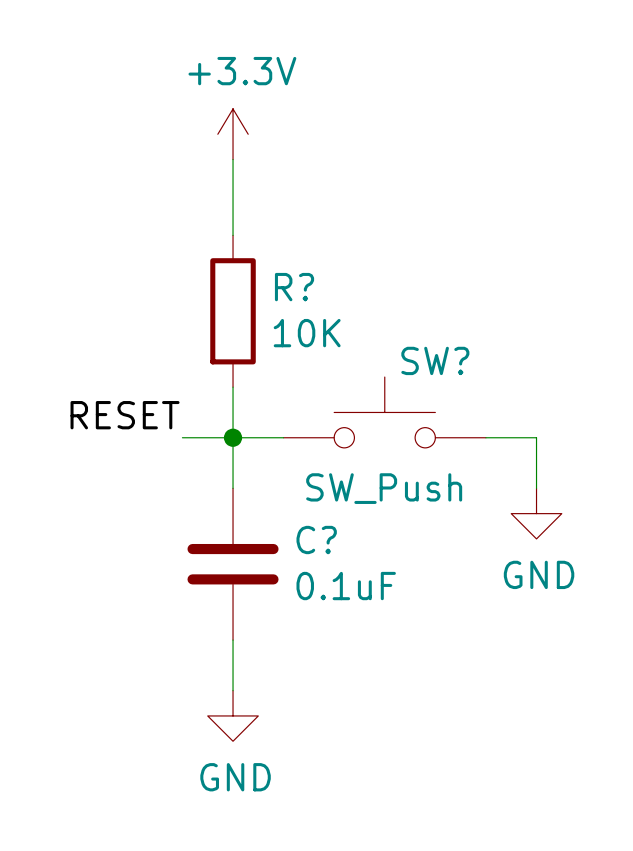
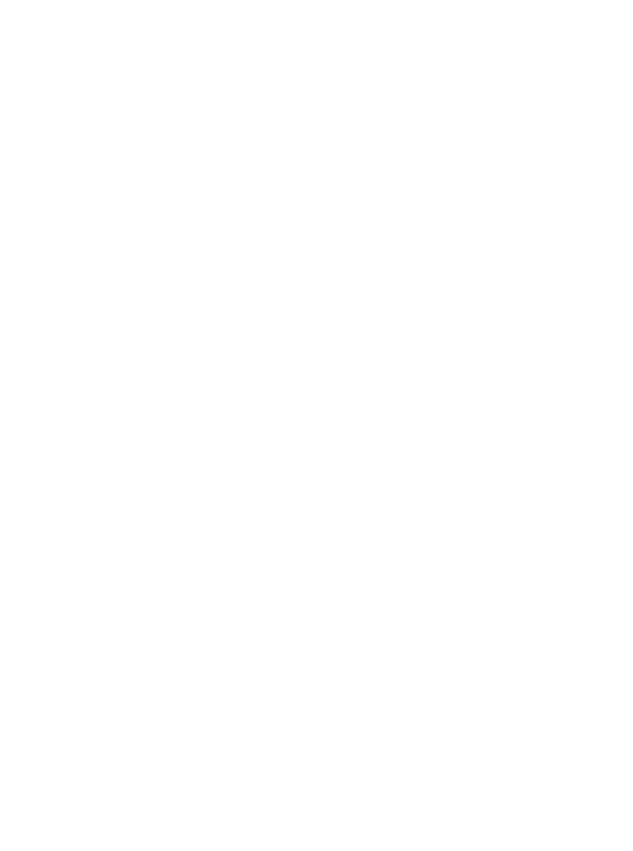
power symbol: +3.3V (233, 134) -> none
wire: (233, 159) (233, 235) -> none
R?: 10K (233, 311) -> none
wire: (233, 387) (233, 488) -> none
SW?: SW_Push (384, 412) -> none
label: RESET (125, 415) -> none
wire: (182, 437) (283, 437) -> none
junction: (233, 437) -> none
wire: (485, 437) (536, 437) (536, 488) -> none
power symbol: GND (536, 513) -> none
C?: 0.1uF (233, 564) -> none
wire: (233, 640) (233, 690) -> none
power symbol: GND (233, 715) -> none

